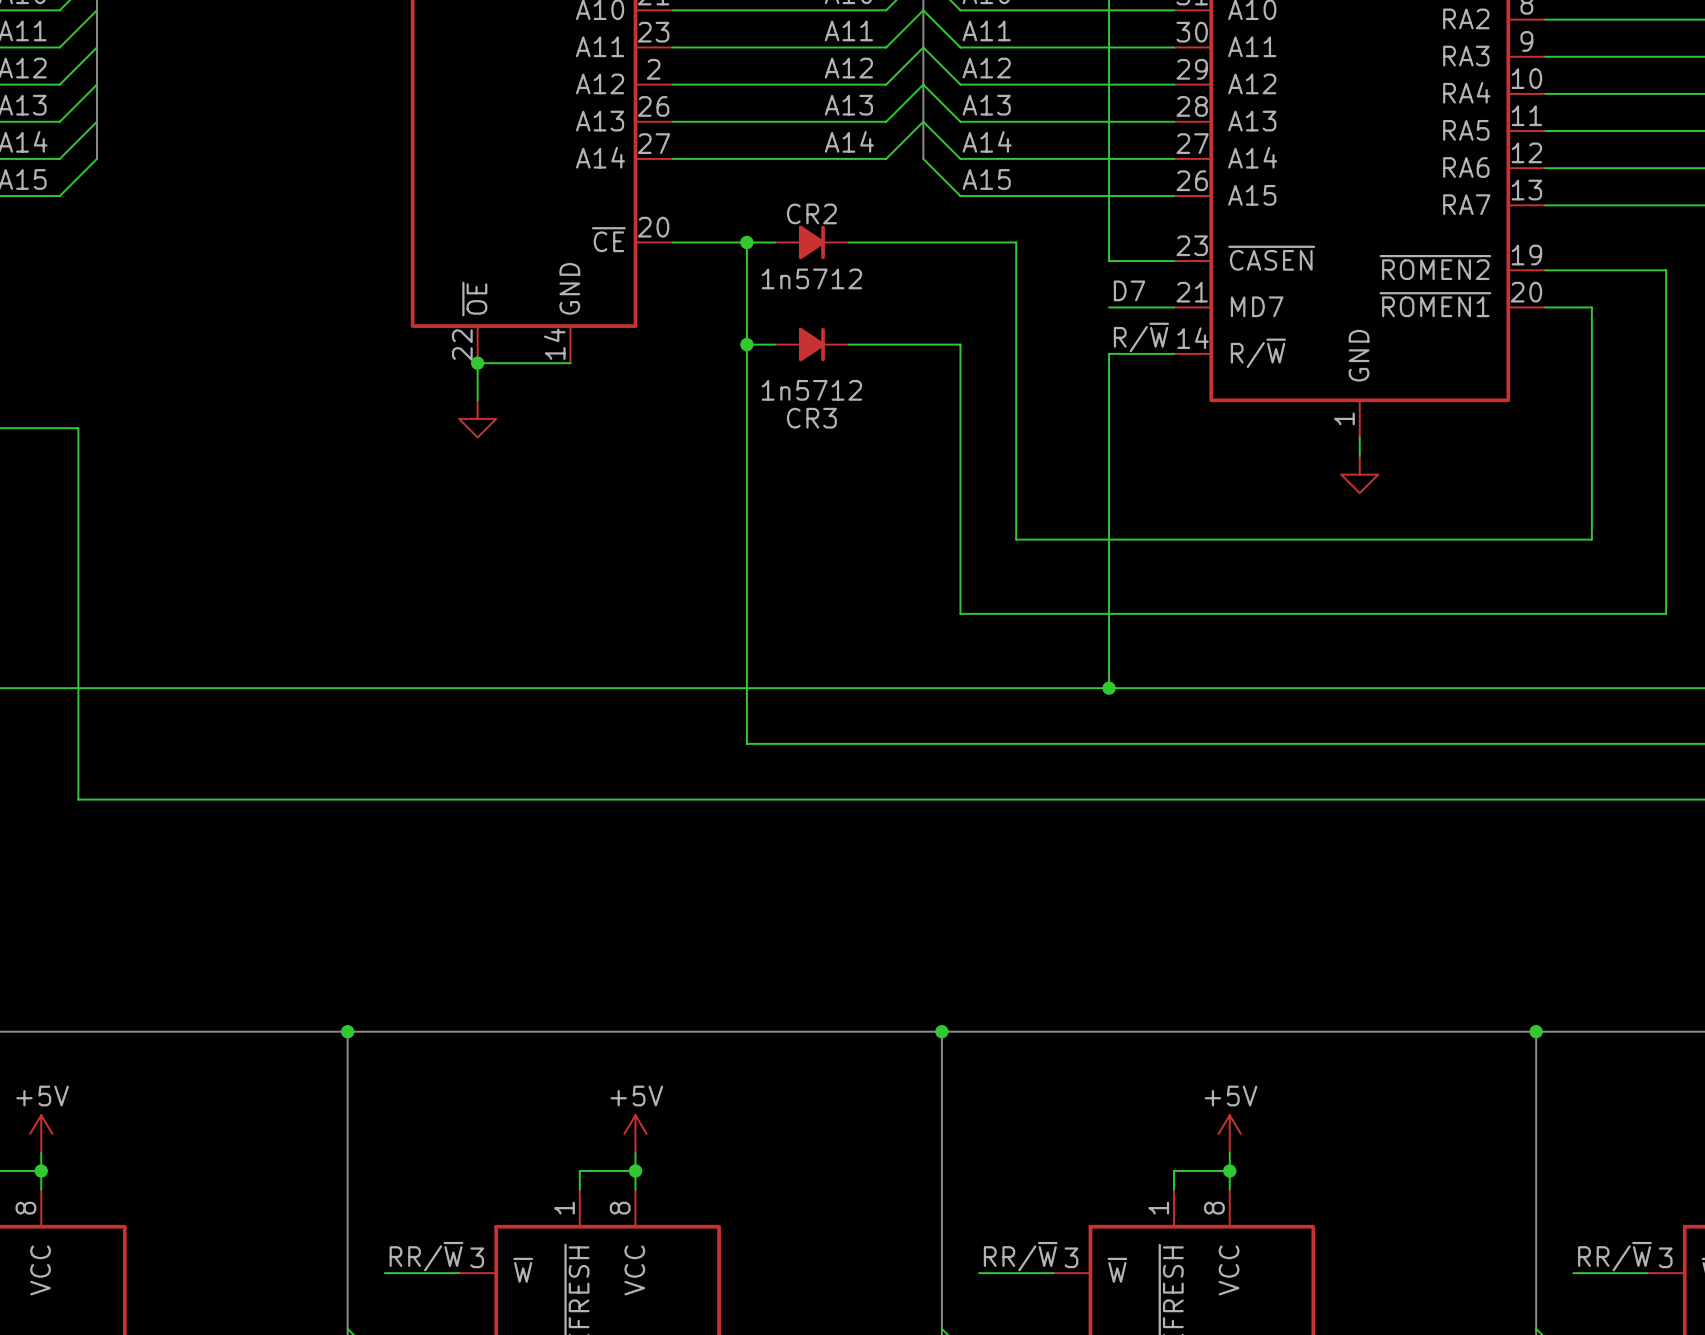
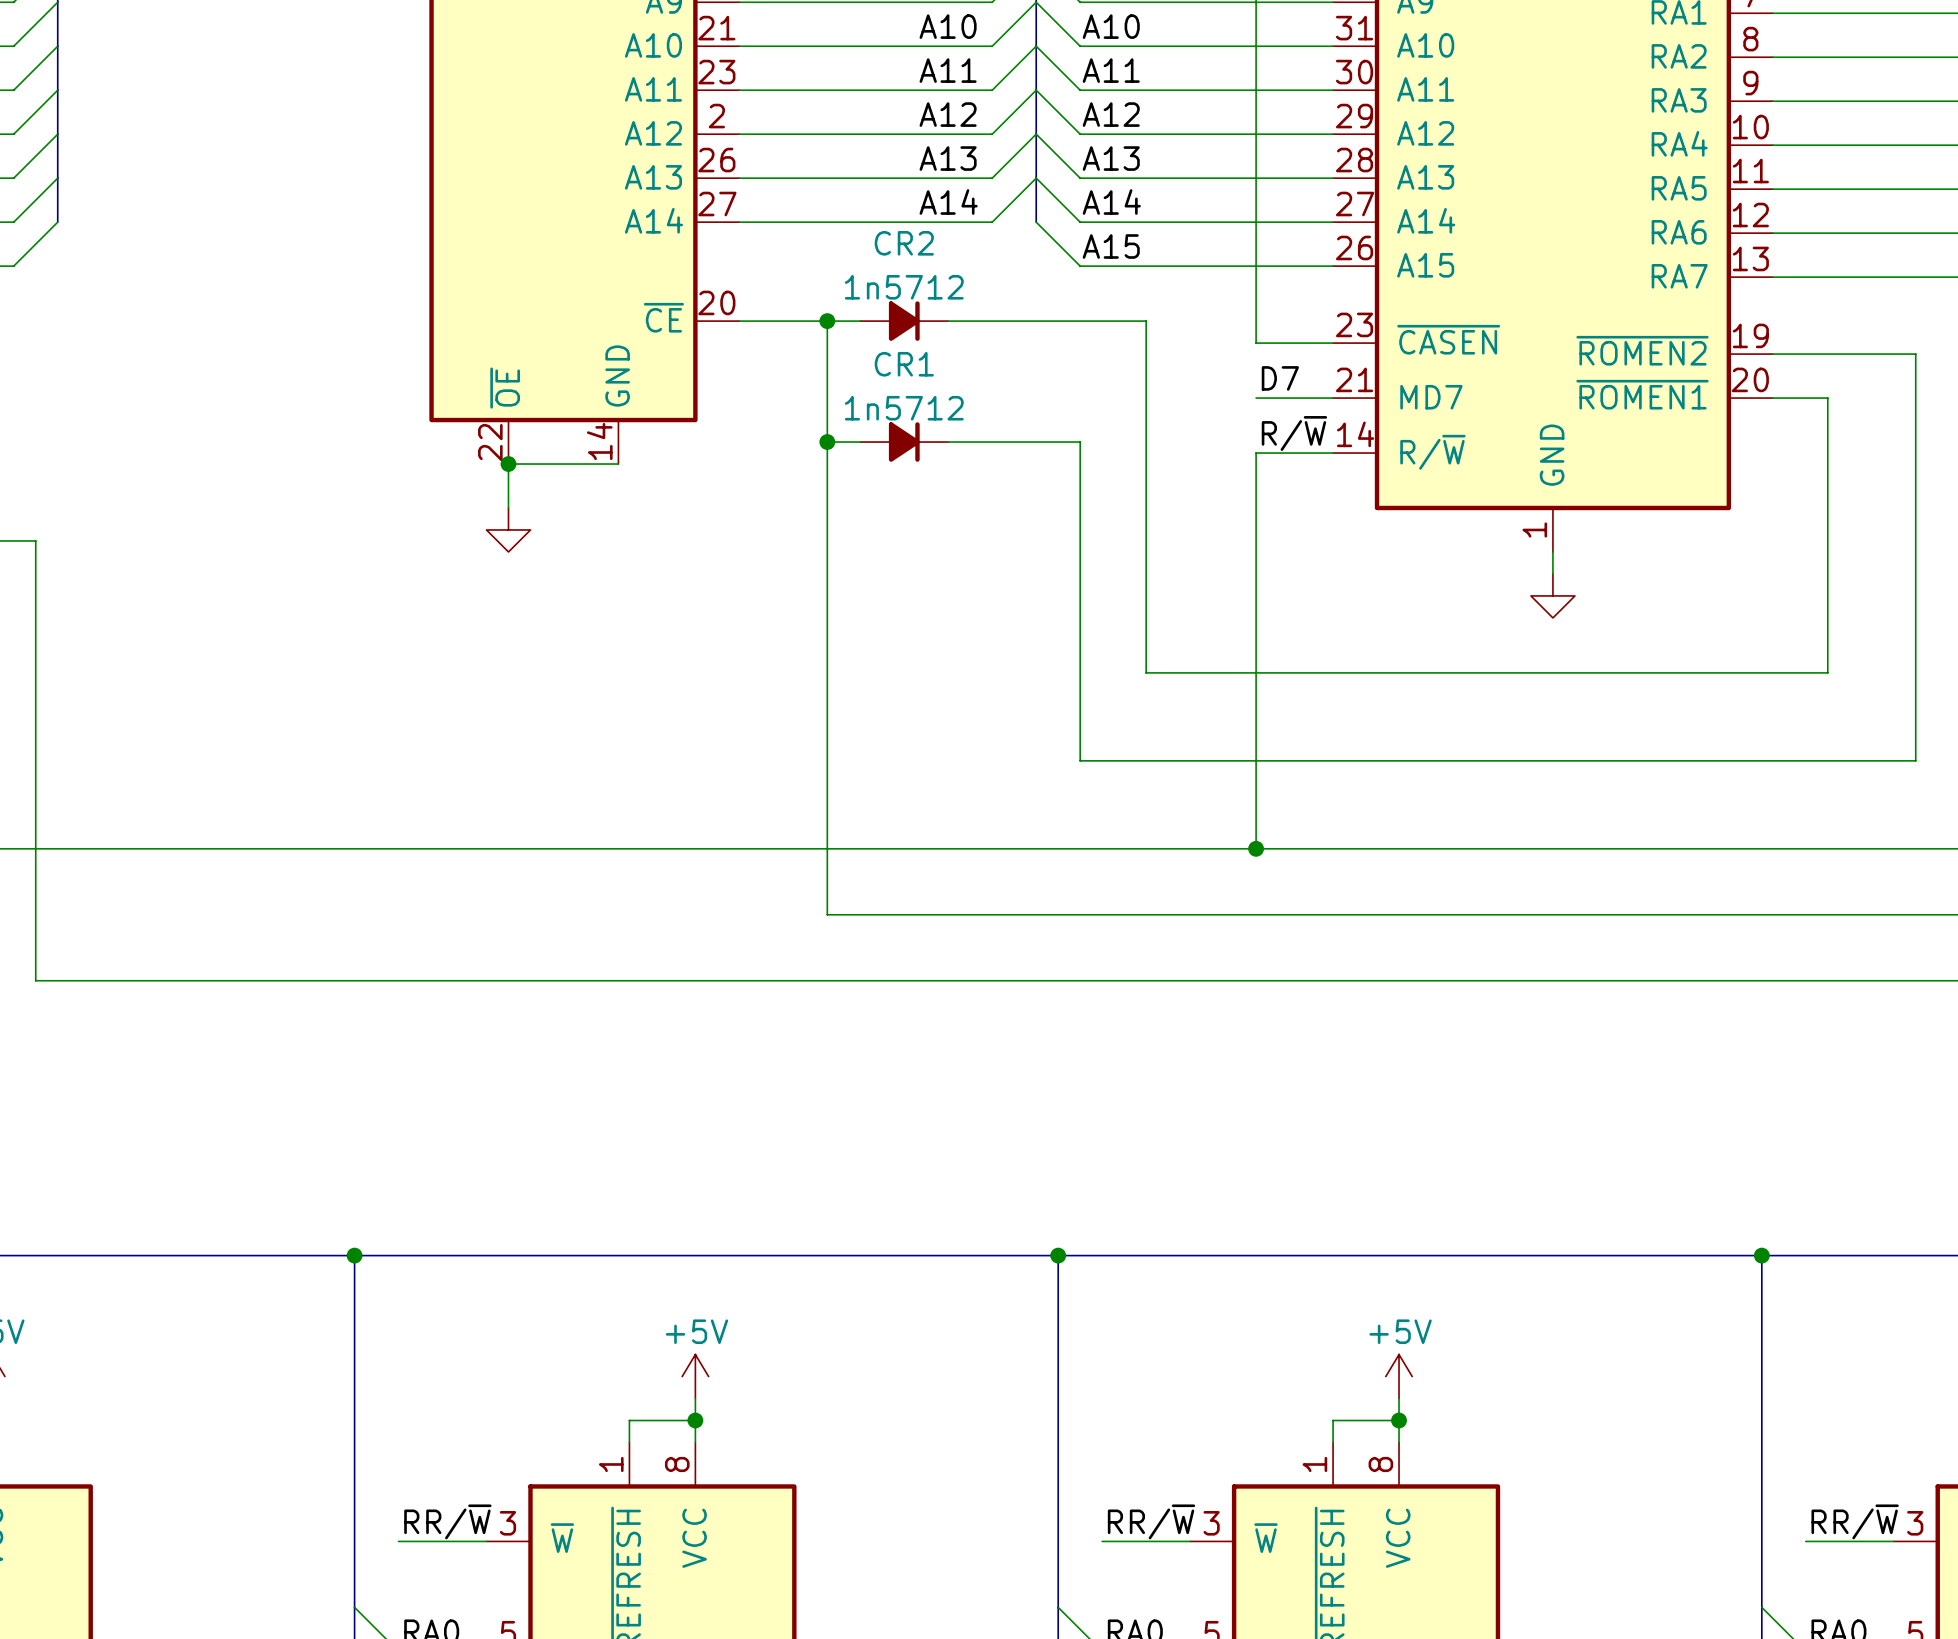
CR2 name position: CR2 (811, 213) -> CR2 (904, 243)
CR2 value position: 1n5712 (811, 278) -> 1n5712 (904, 287)
CR3 value position: 1n5712 (811, 390) -> 1n5712 (904, 408)
CR3 name: CR3 (811, 418) -> CR1 (904, 364)

